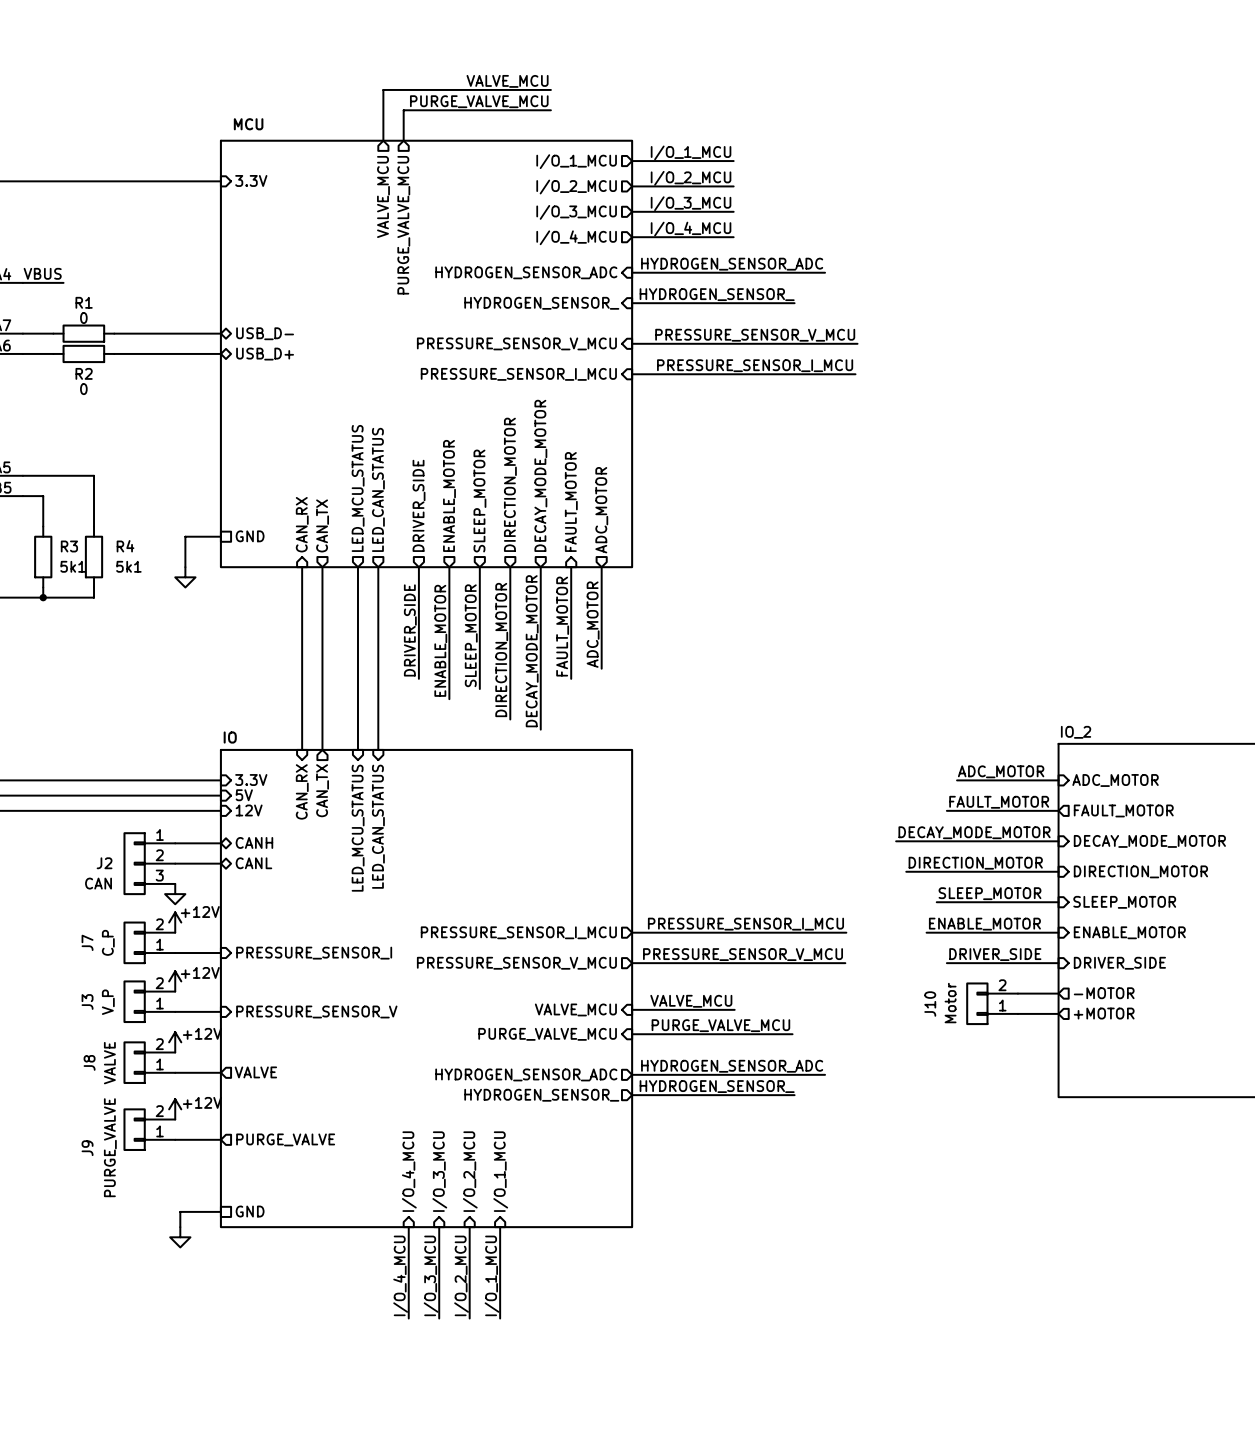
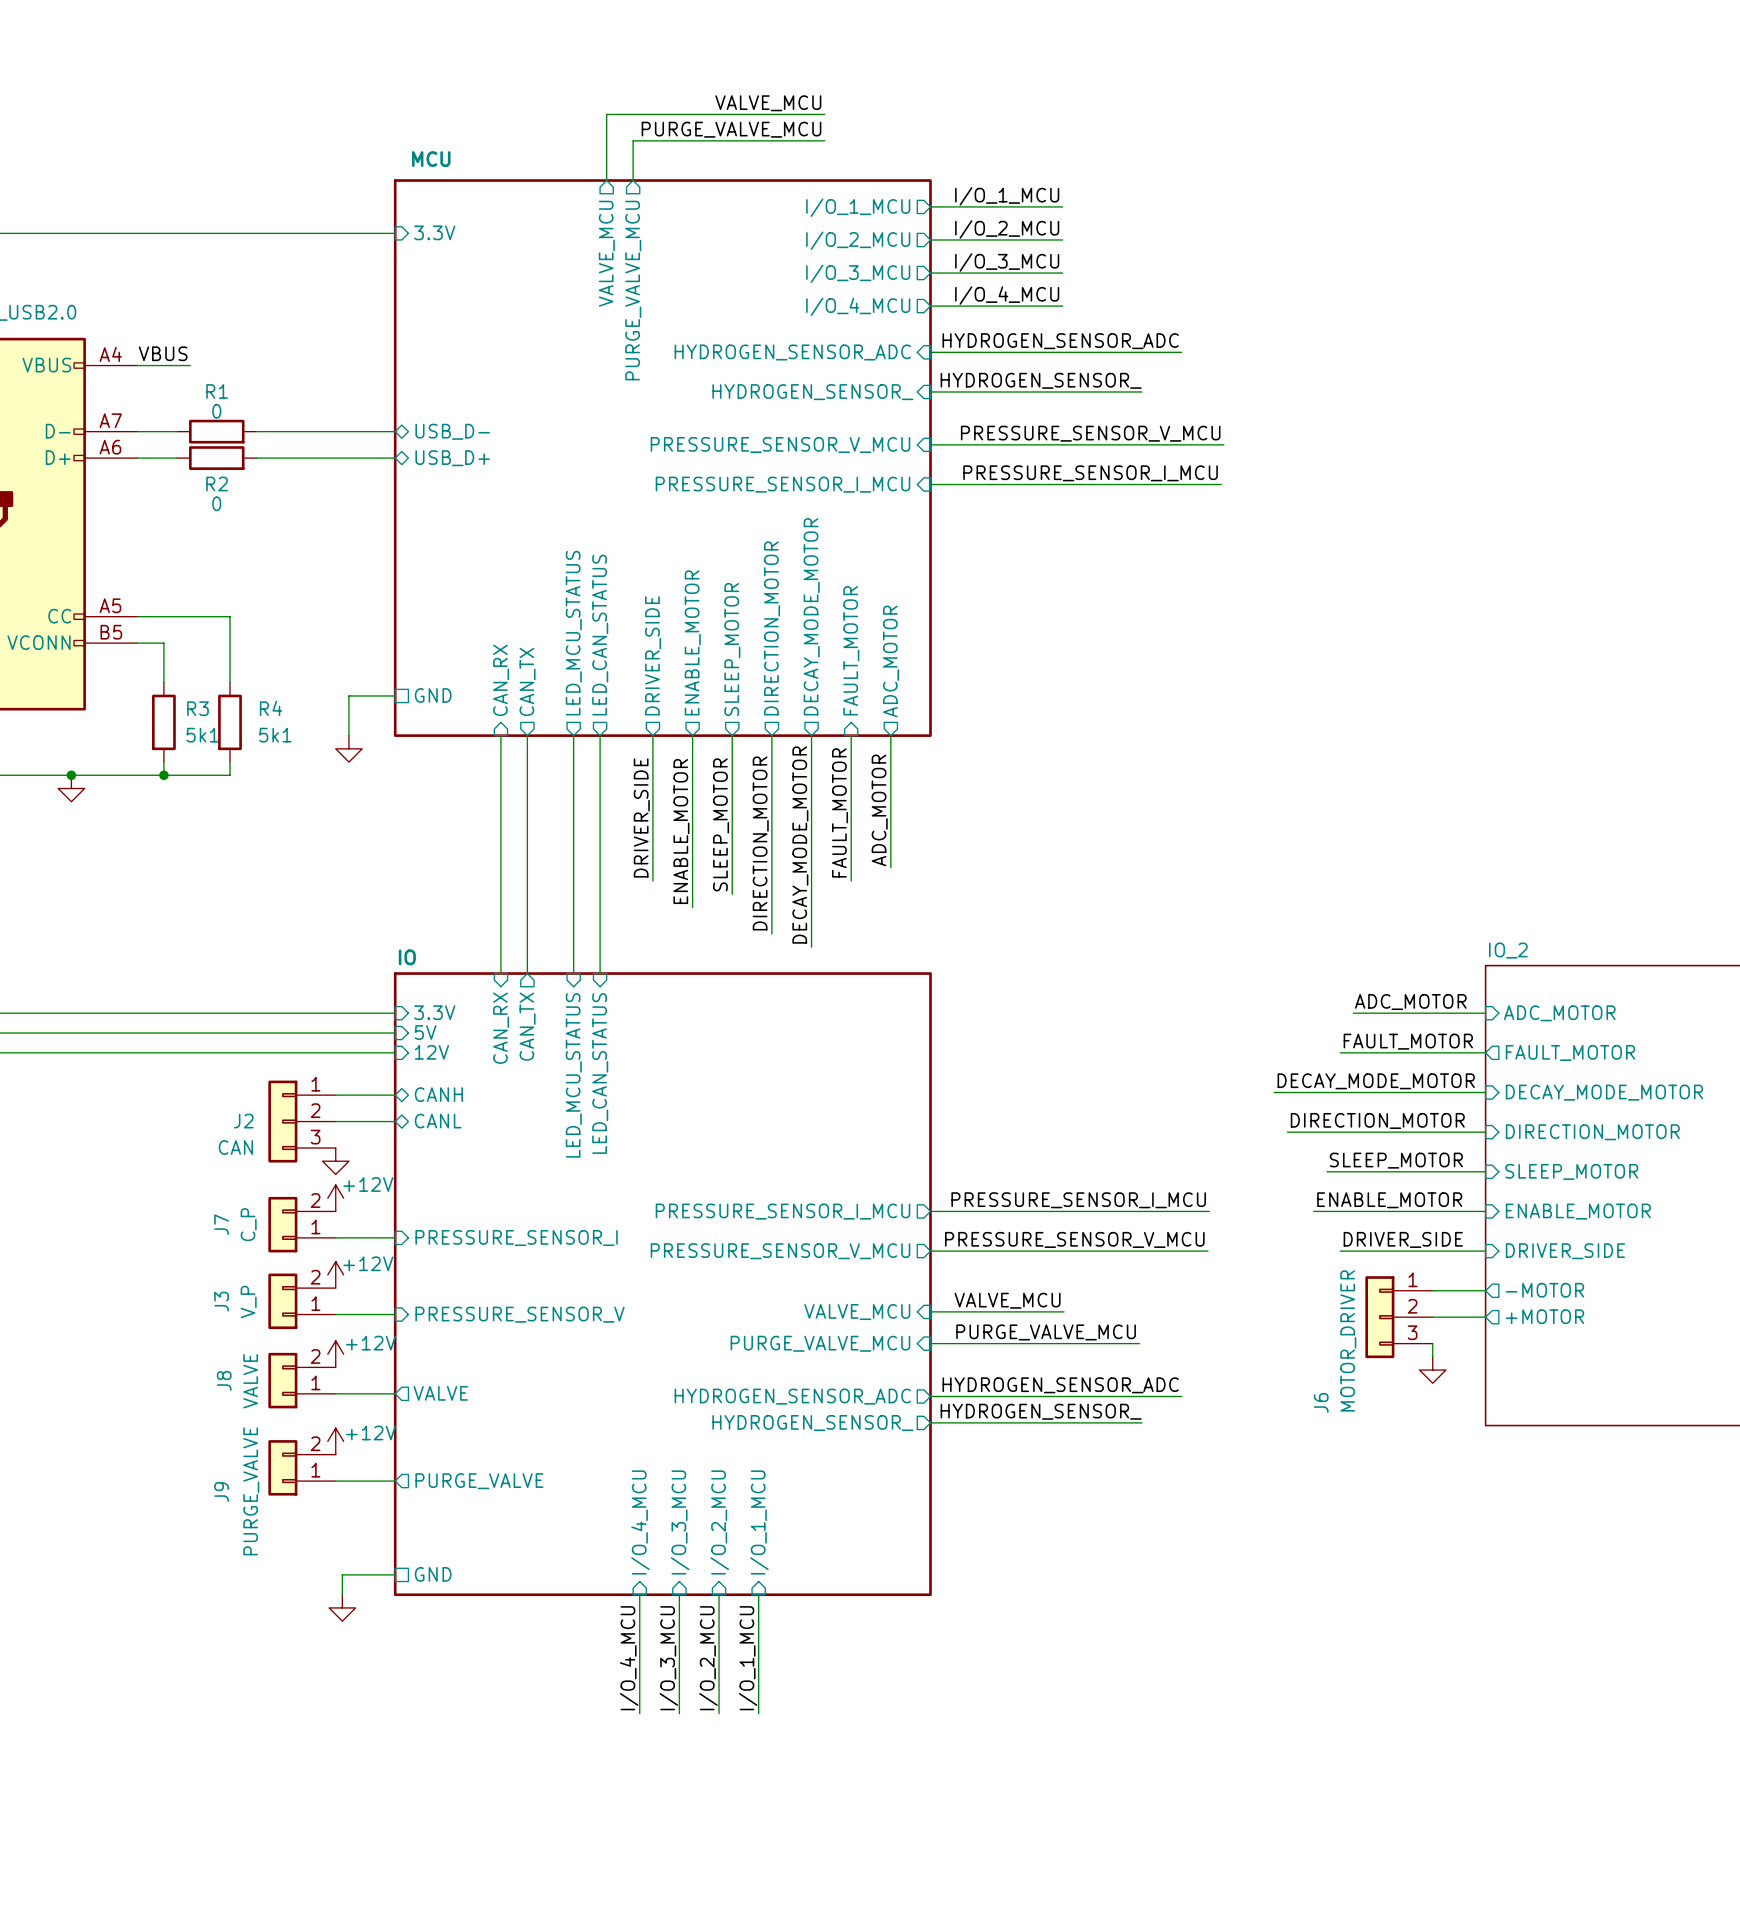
J10: Motor (992, 1003) -> none
J6: none -> MOTOR_DRIVER (1399, 1317)
wire: none -> (1432, 1343) (1432, 1356)
power symbol: none -> (1432, 1370)

